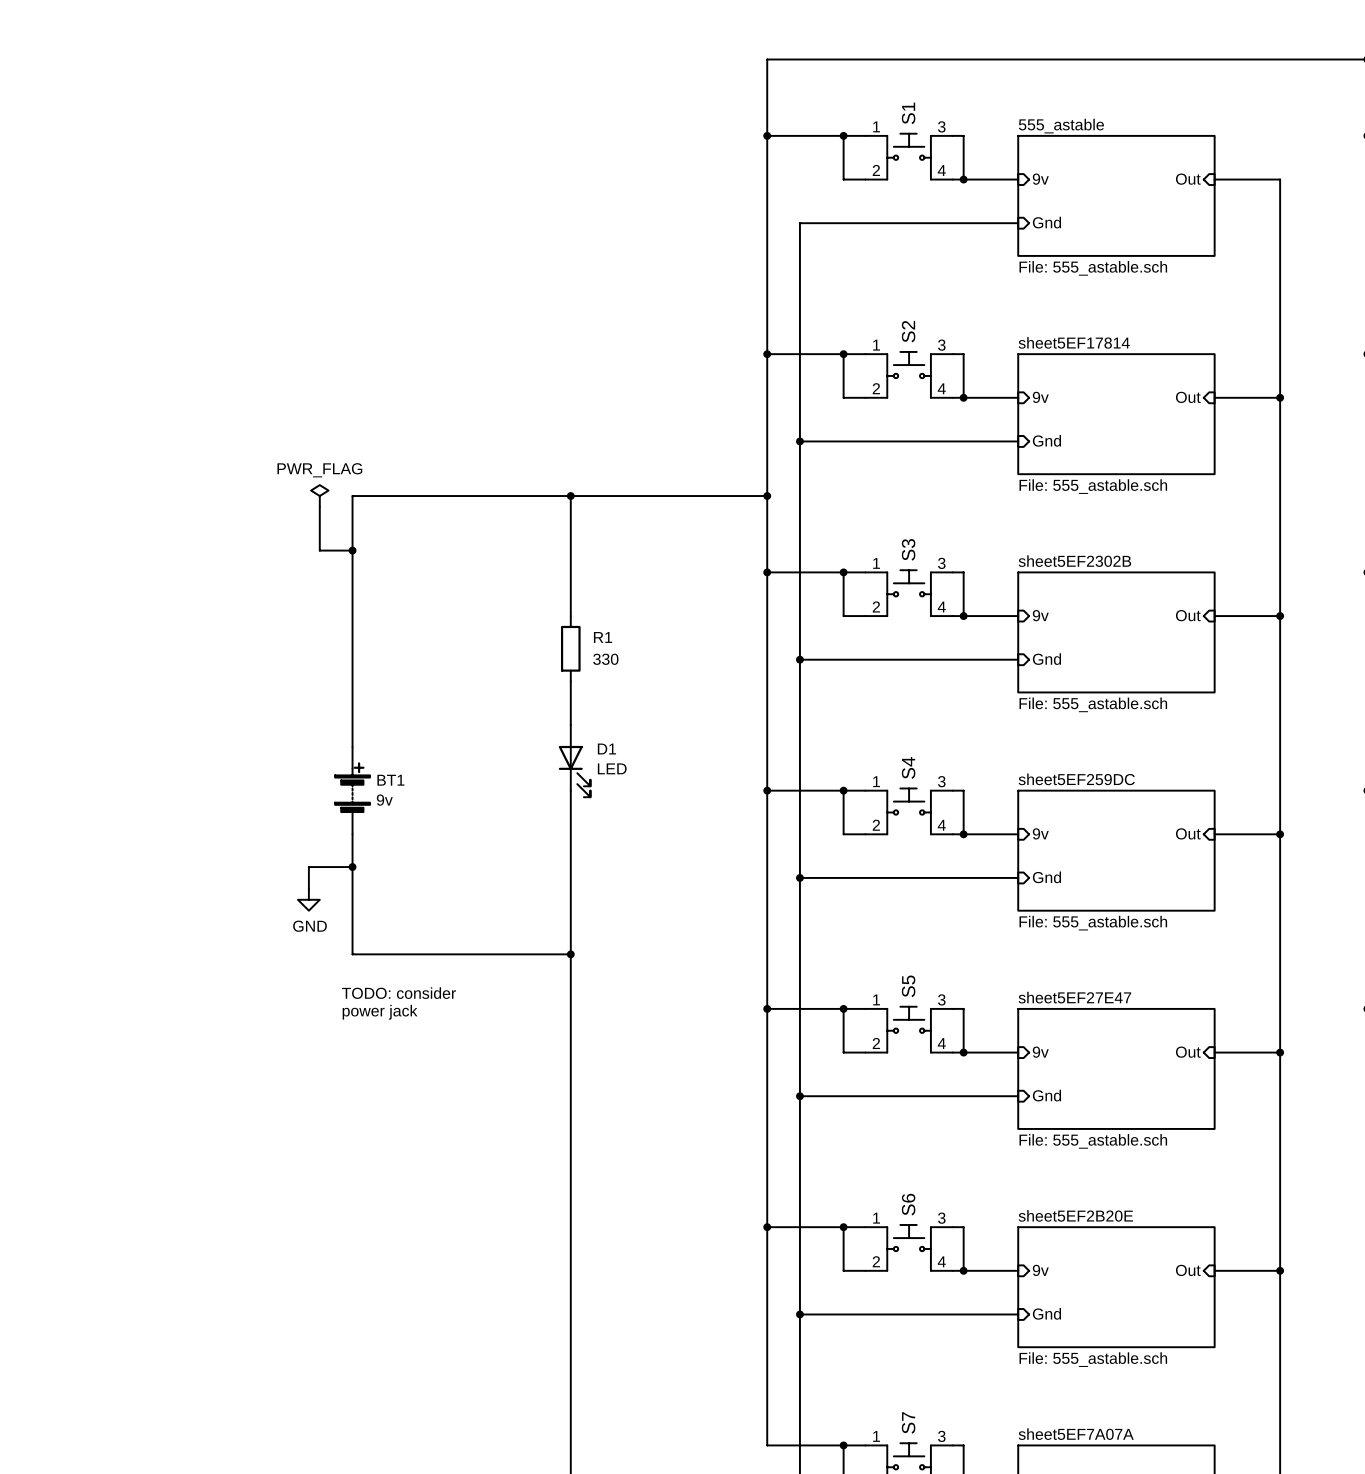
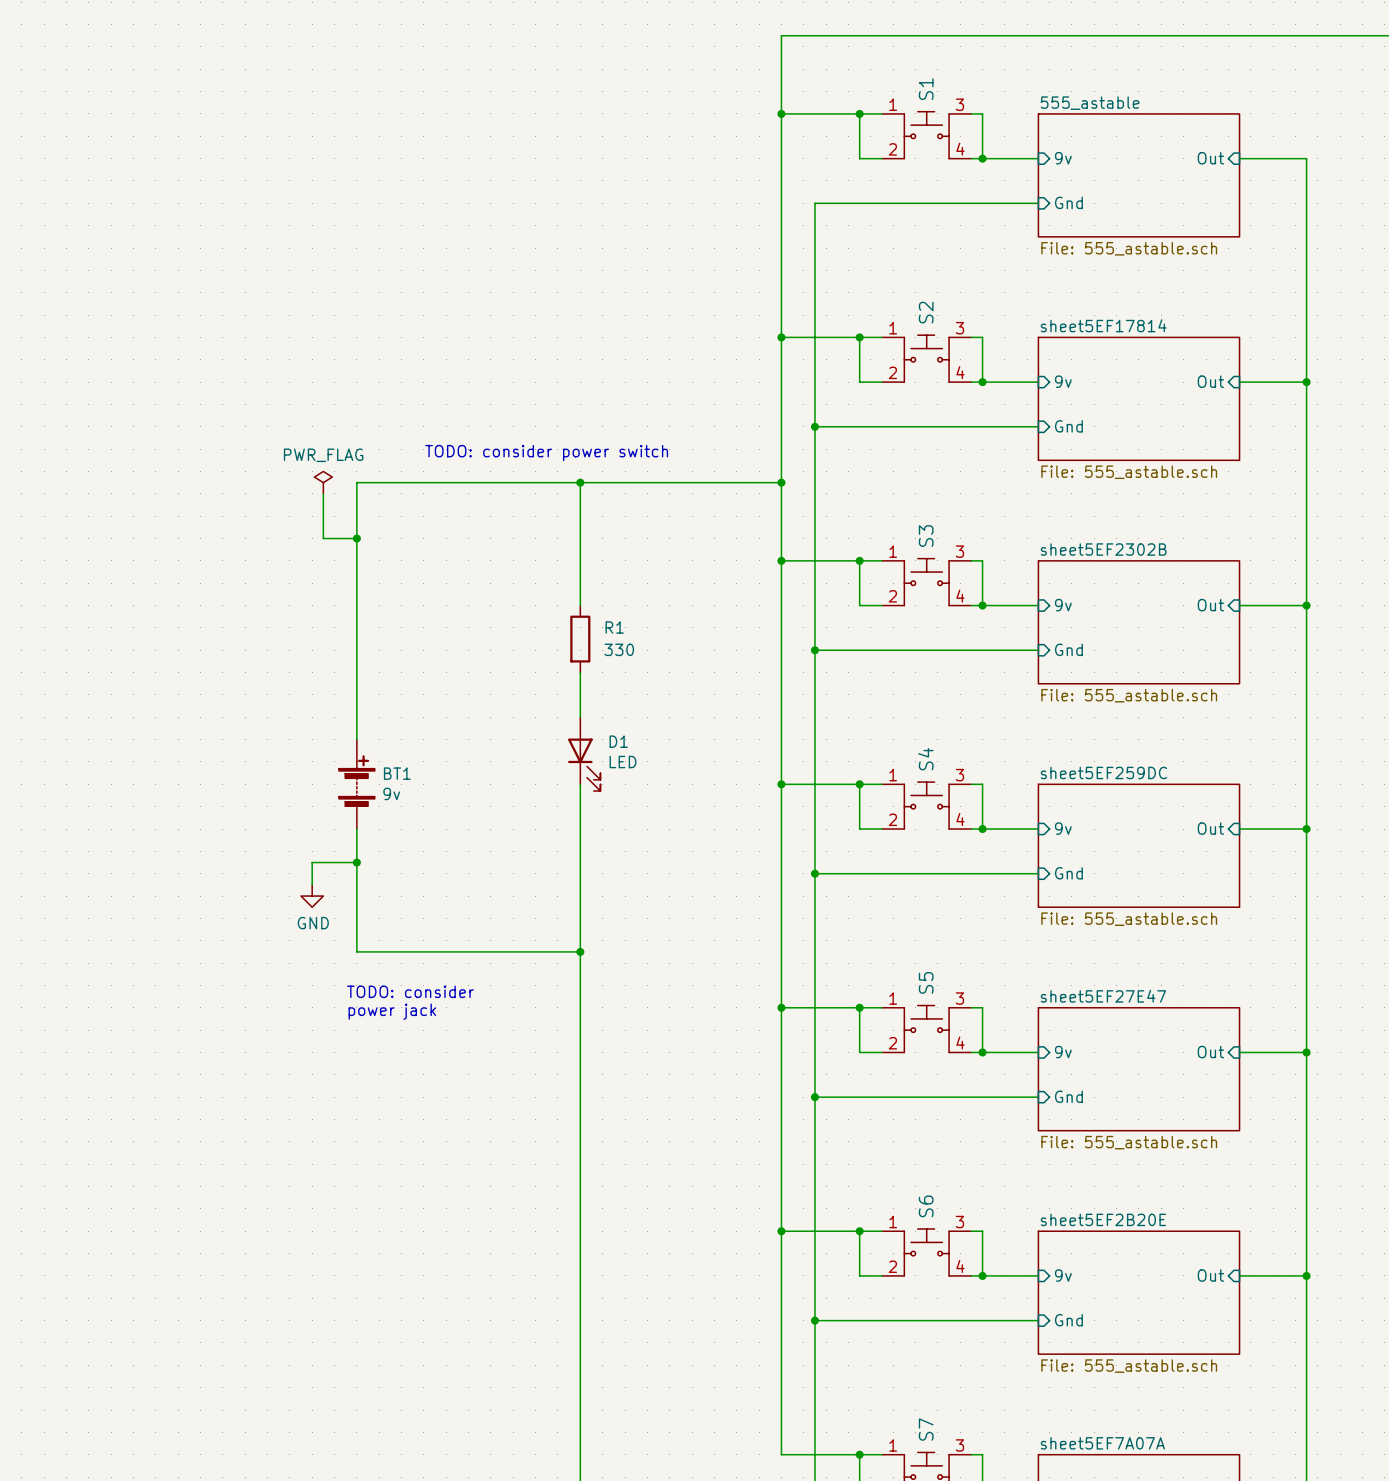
text: none -> TODO: consider power switch (546, 453)

